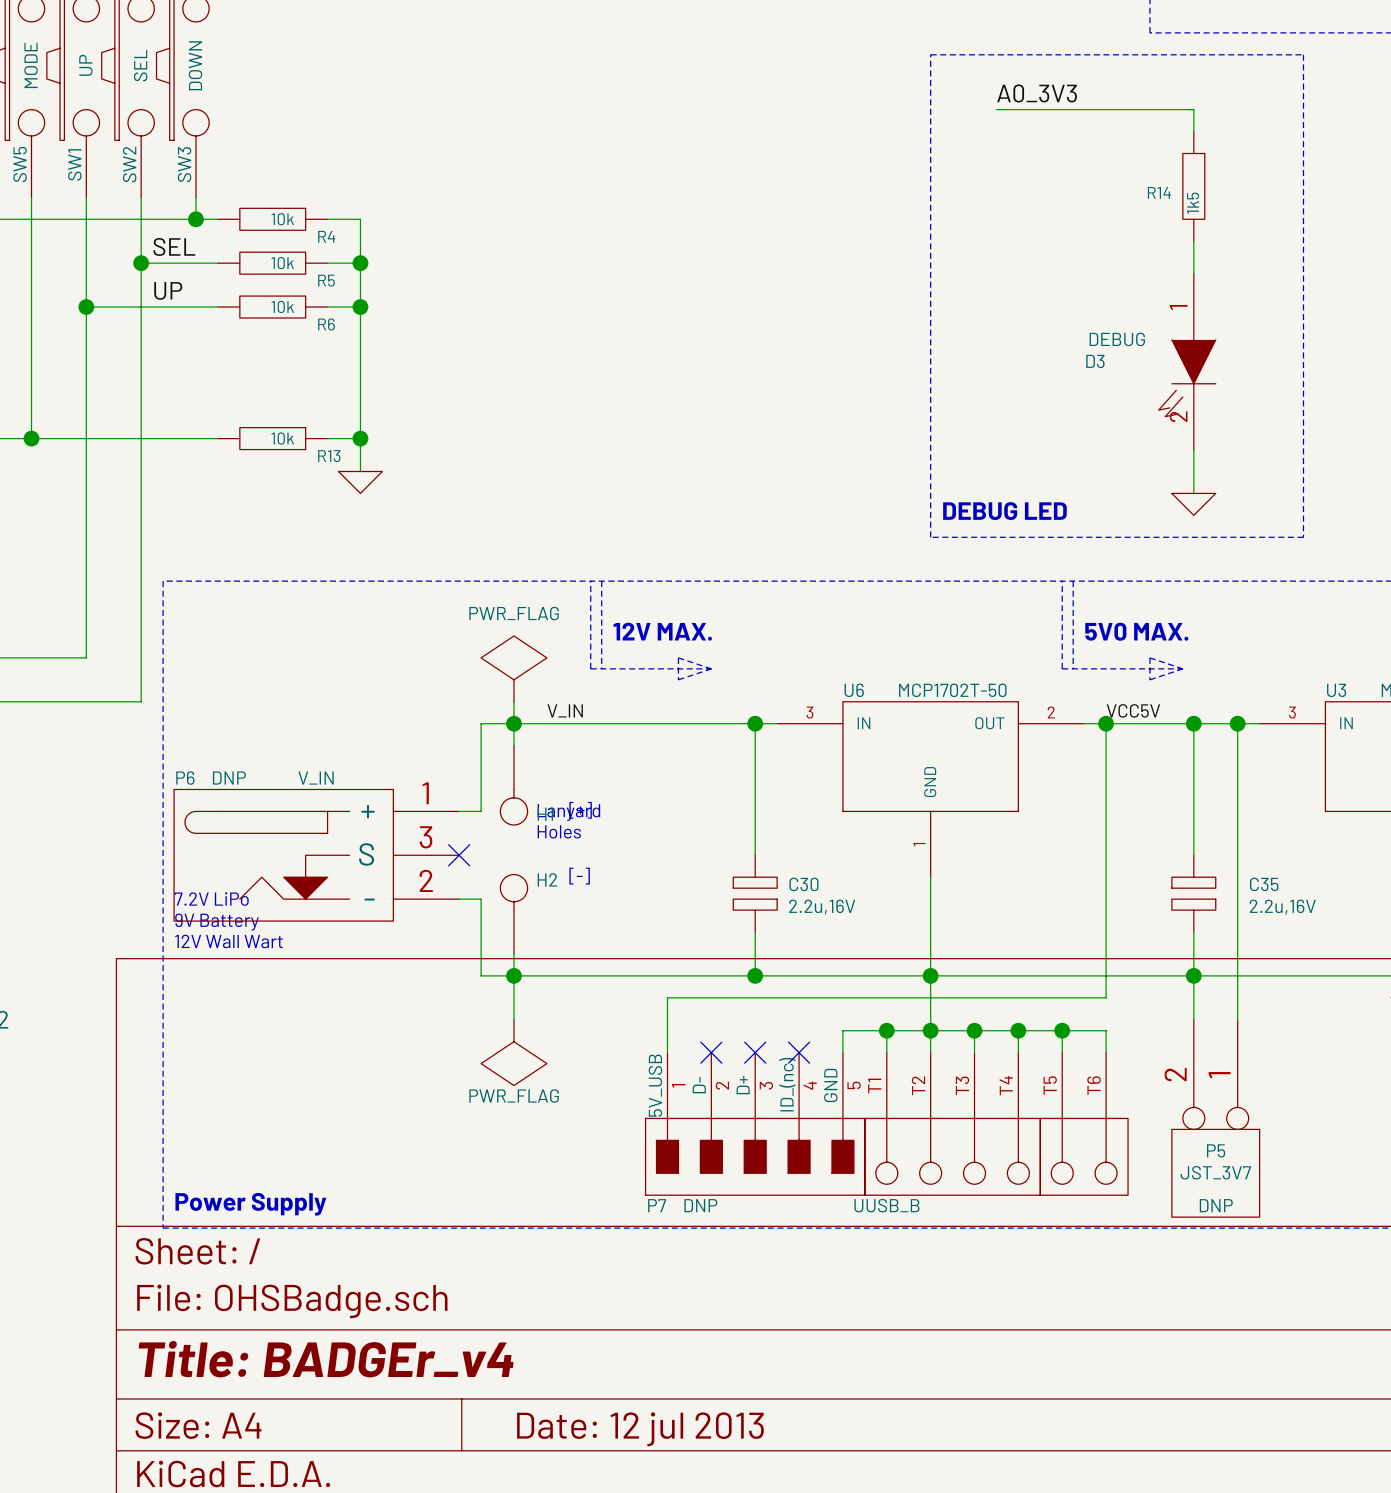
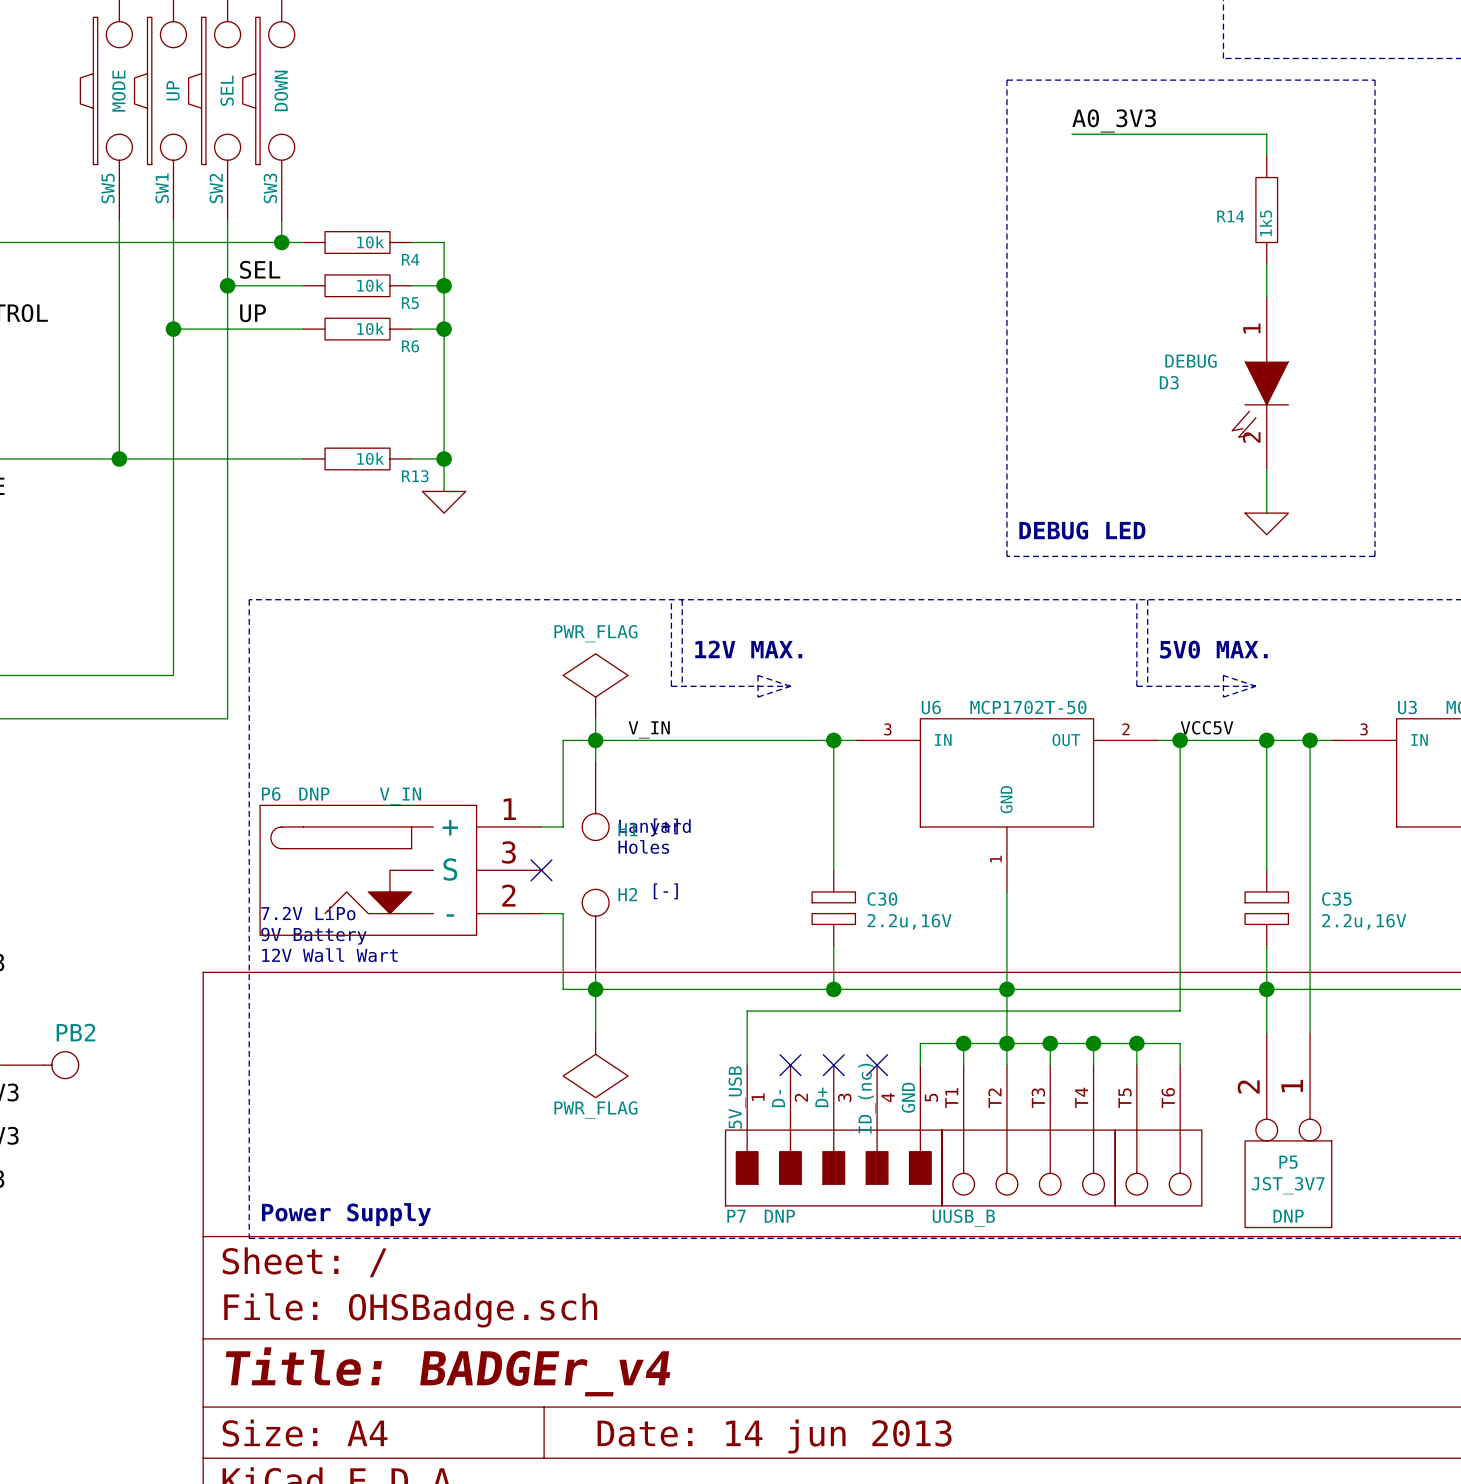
title block: Date: 12 jul 2013 (640, 1429) -> Date: 14 jun 2013 (774, 1436)

